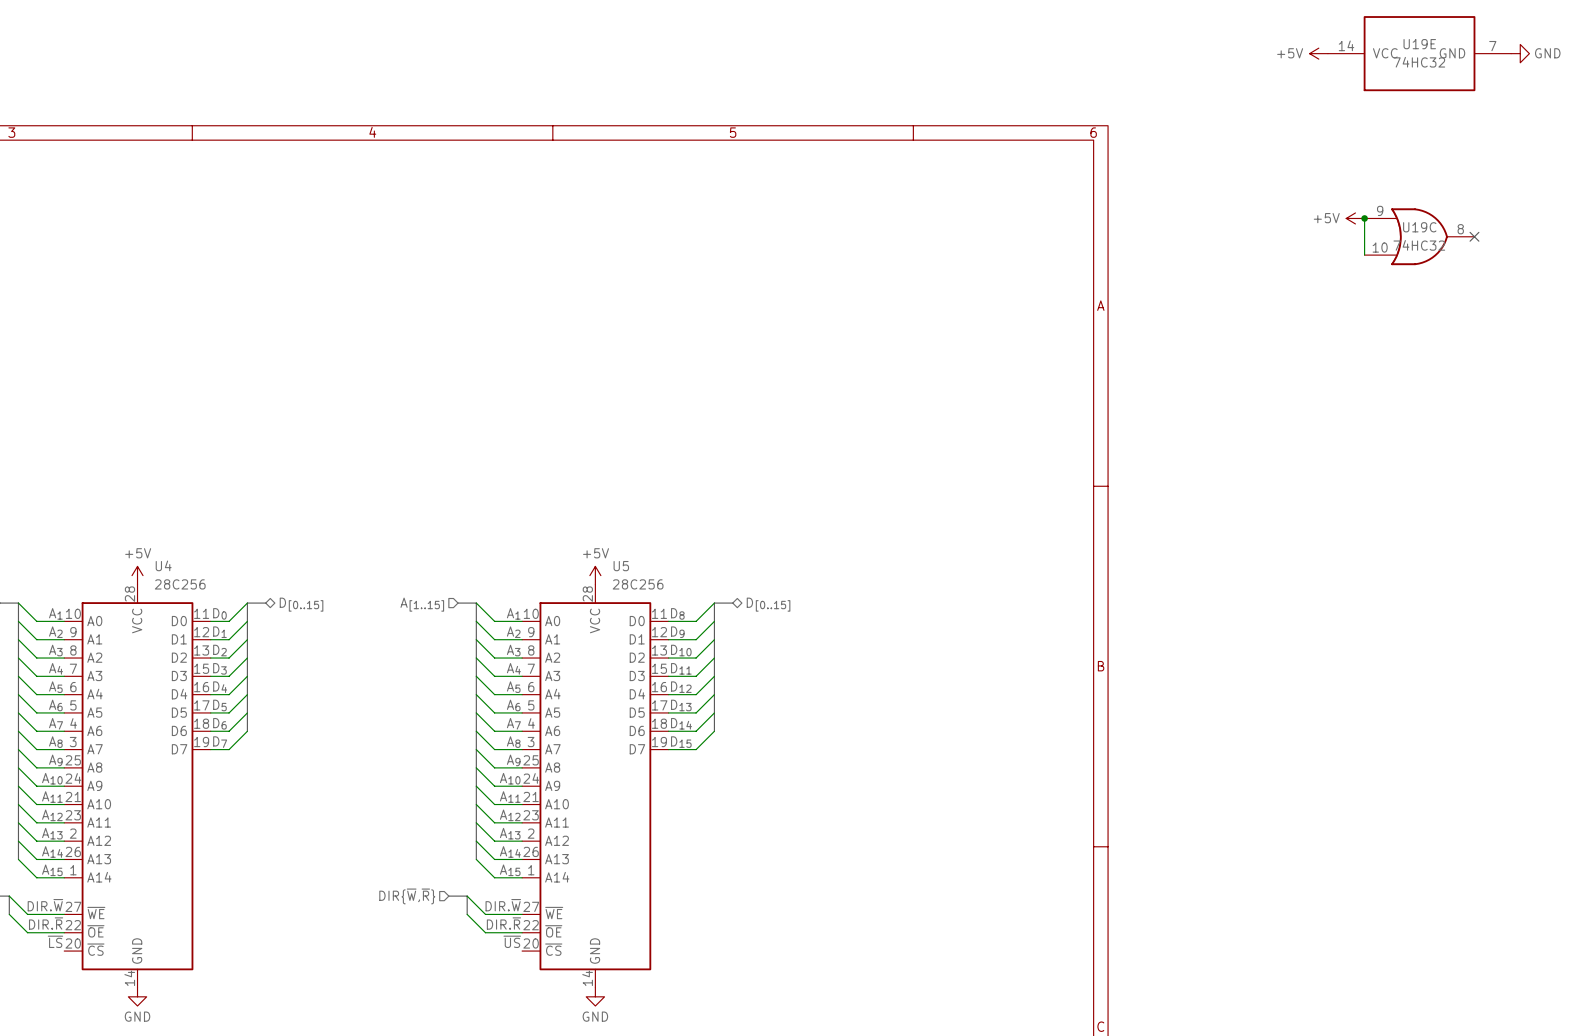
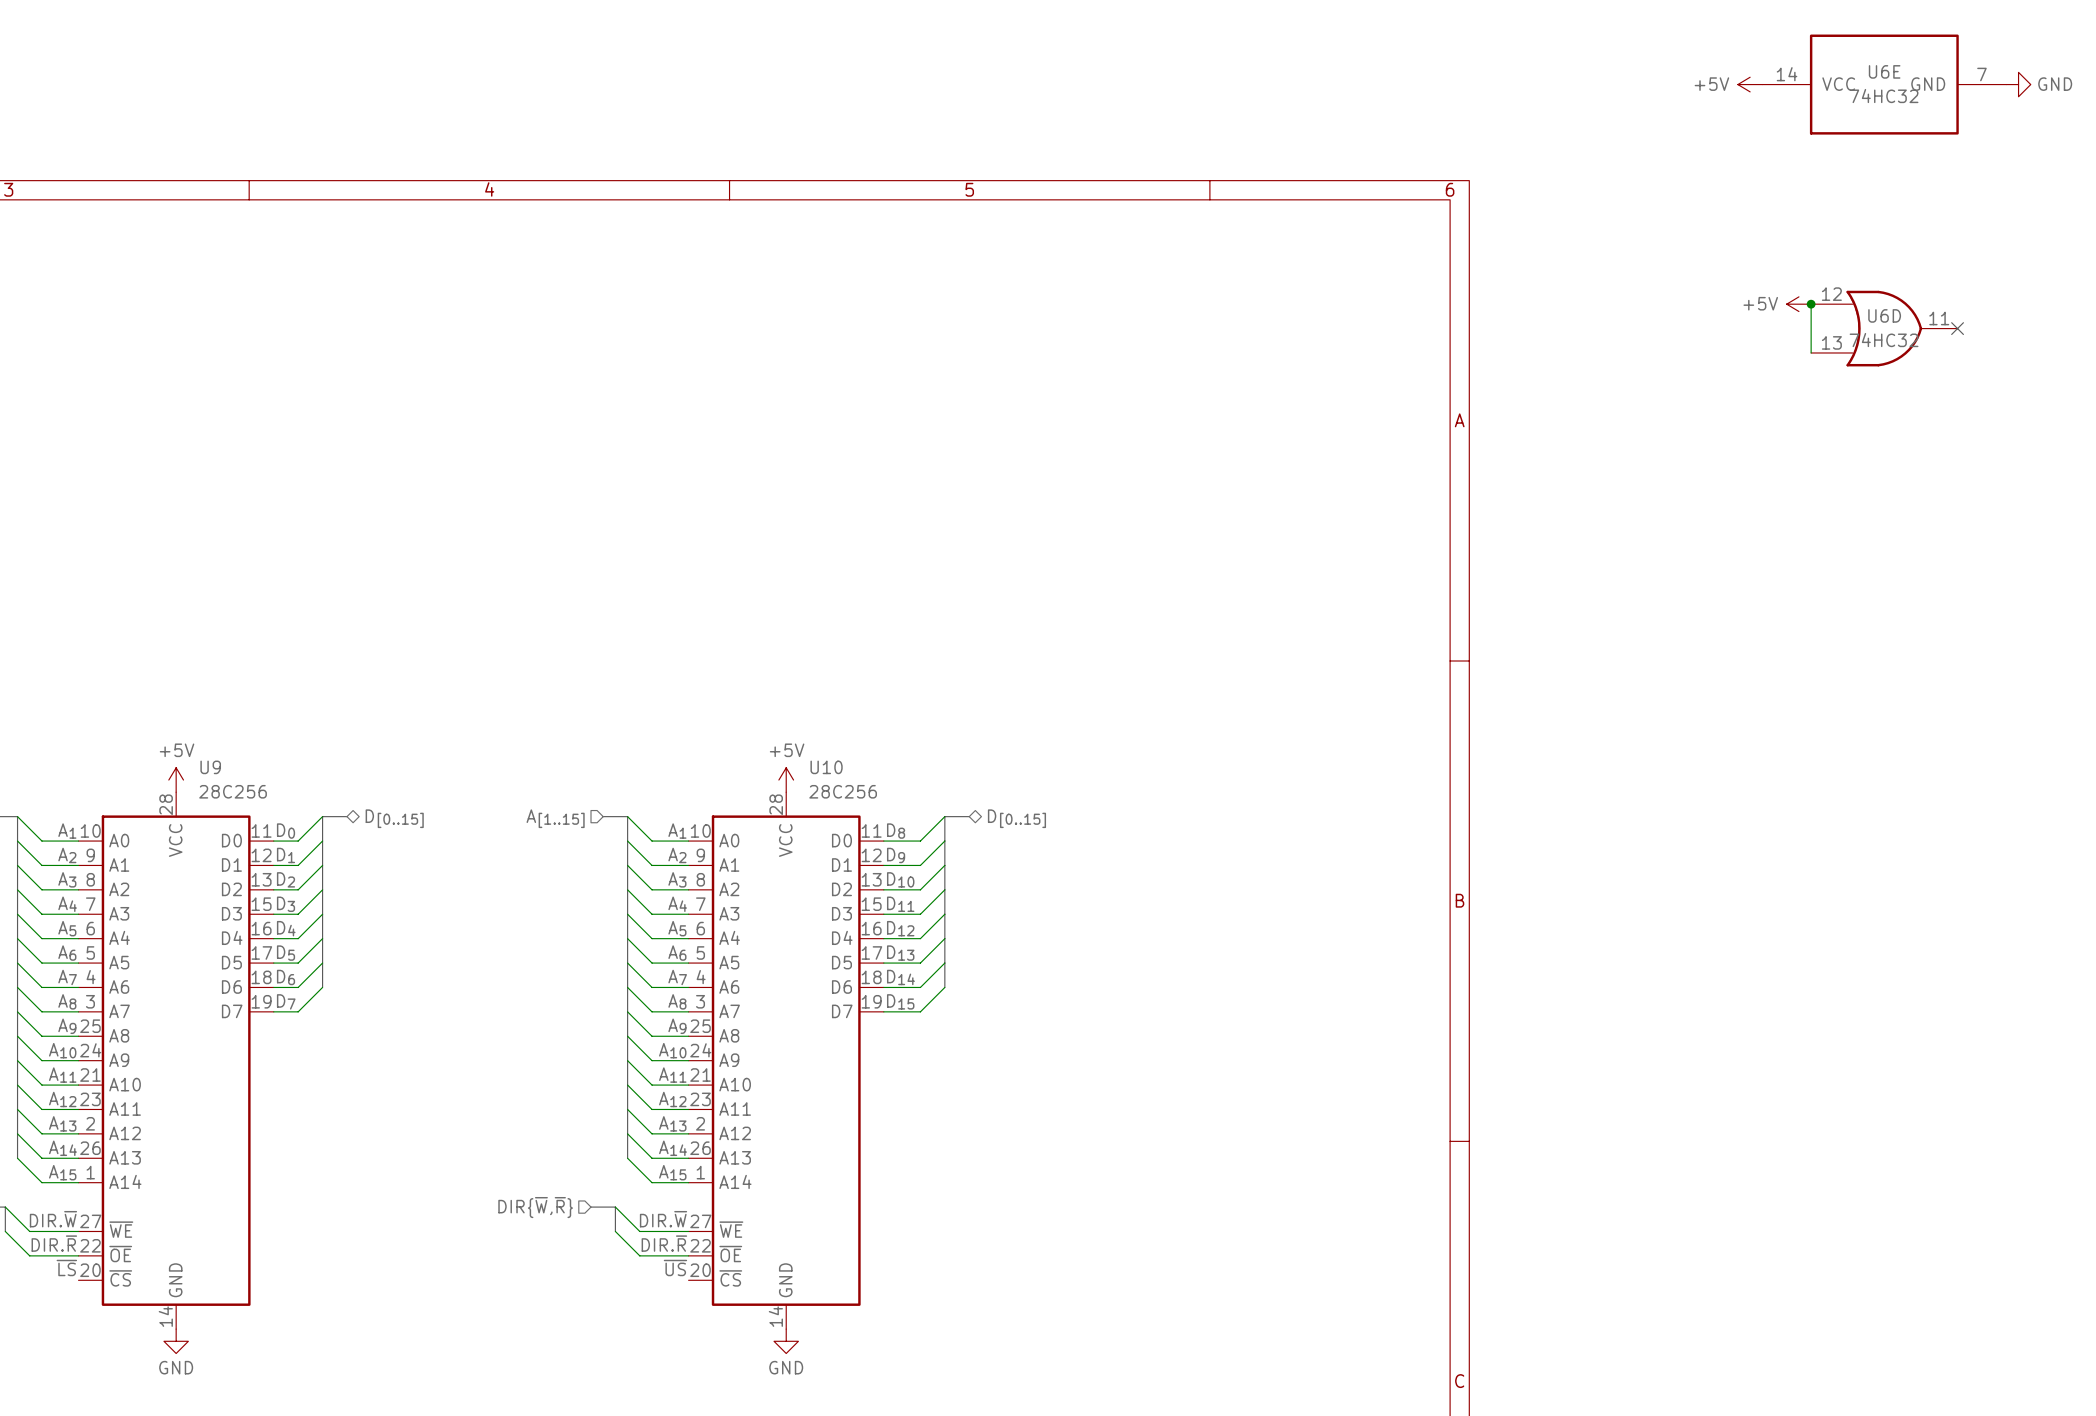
U19E name: U19E (1419, 44) -> U6E (1884, 71)
U19C pin number: 9 (1380, 210) -> 12 (1831, 294)
U19C name: U19C (1419, 227) -> U6D (1884, 315)
U19C pin number: 8 (1460, 229) -> 11 (1939, 318)
U19C pin number: 10 (1380, 247) -> 13 (1831, 342)
U4 name: U4 (163, 565) -> U9 (210, 767)
U5 name: U5 (621, 566) -> U10 (826, 767)

